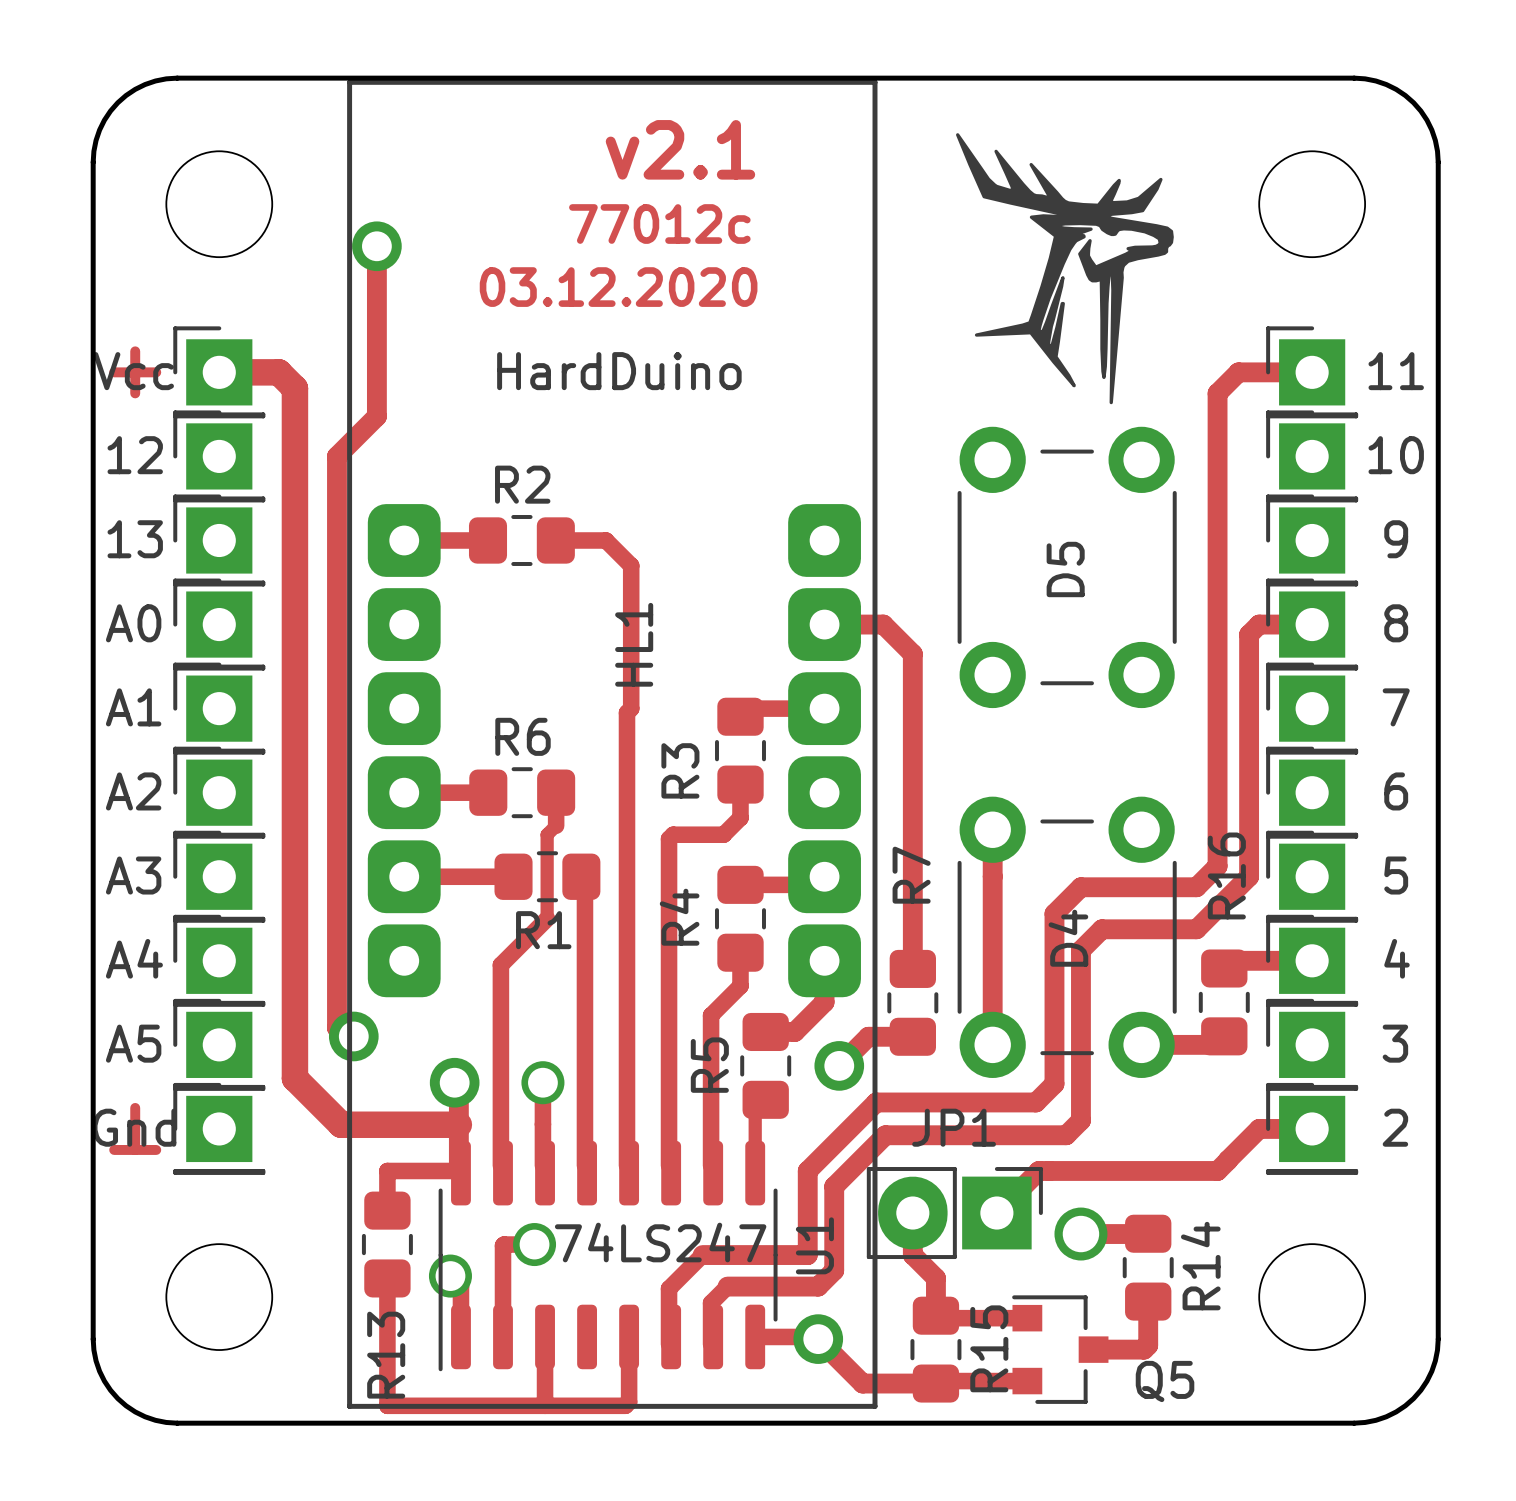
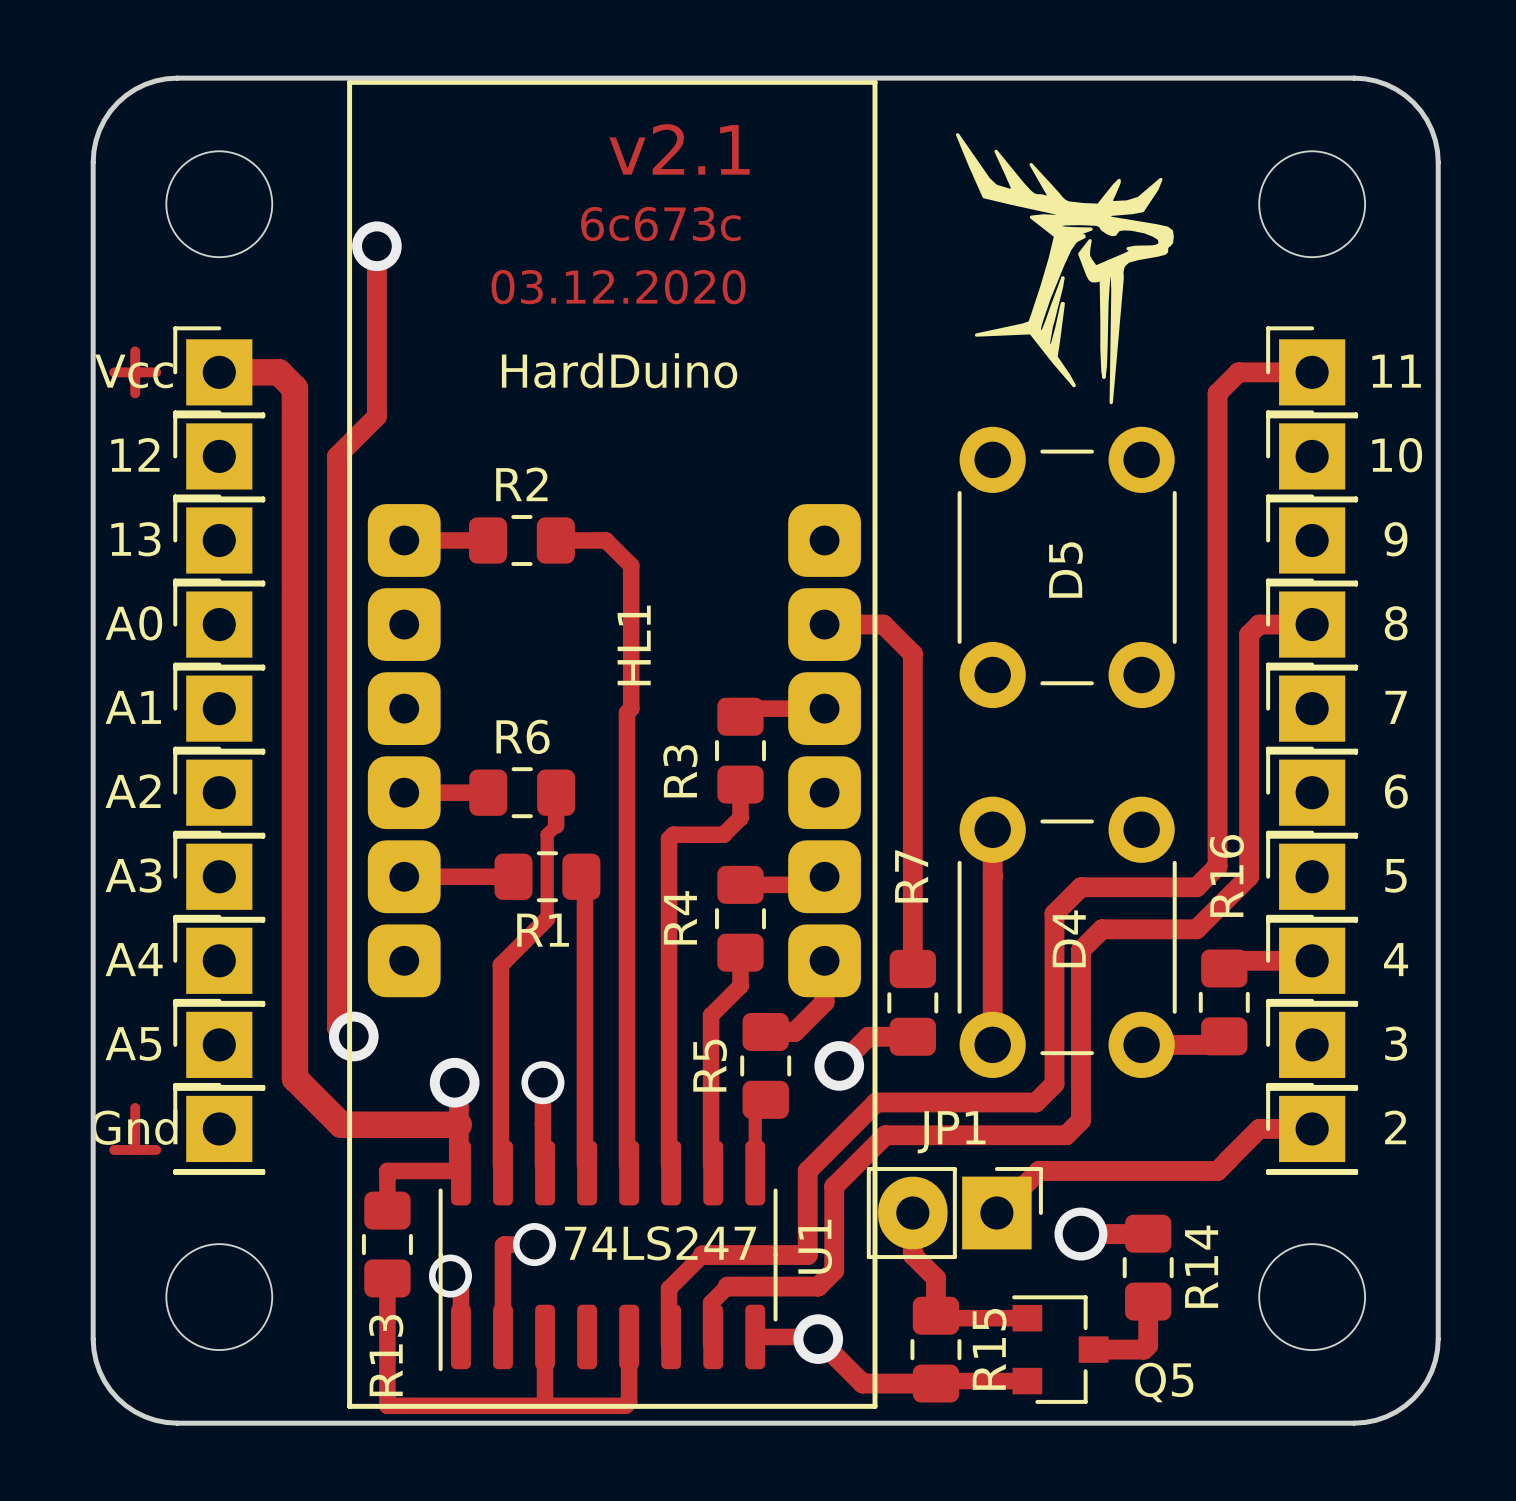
text: 77012c (659, 224) -> 6c673c (660, 224)

